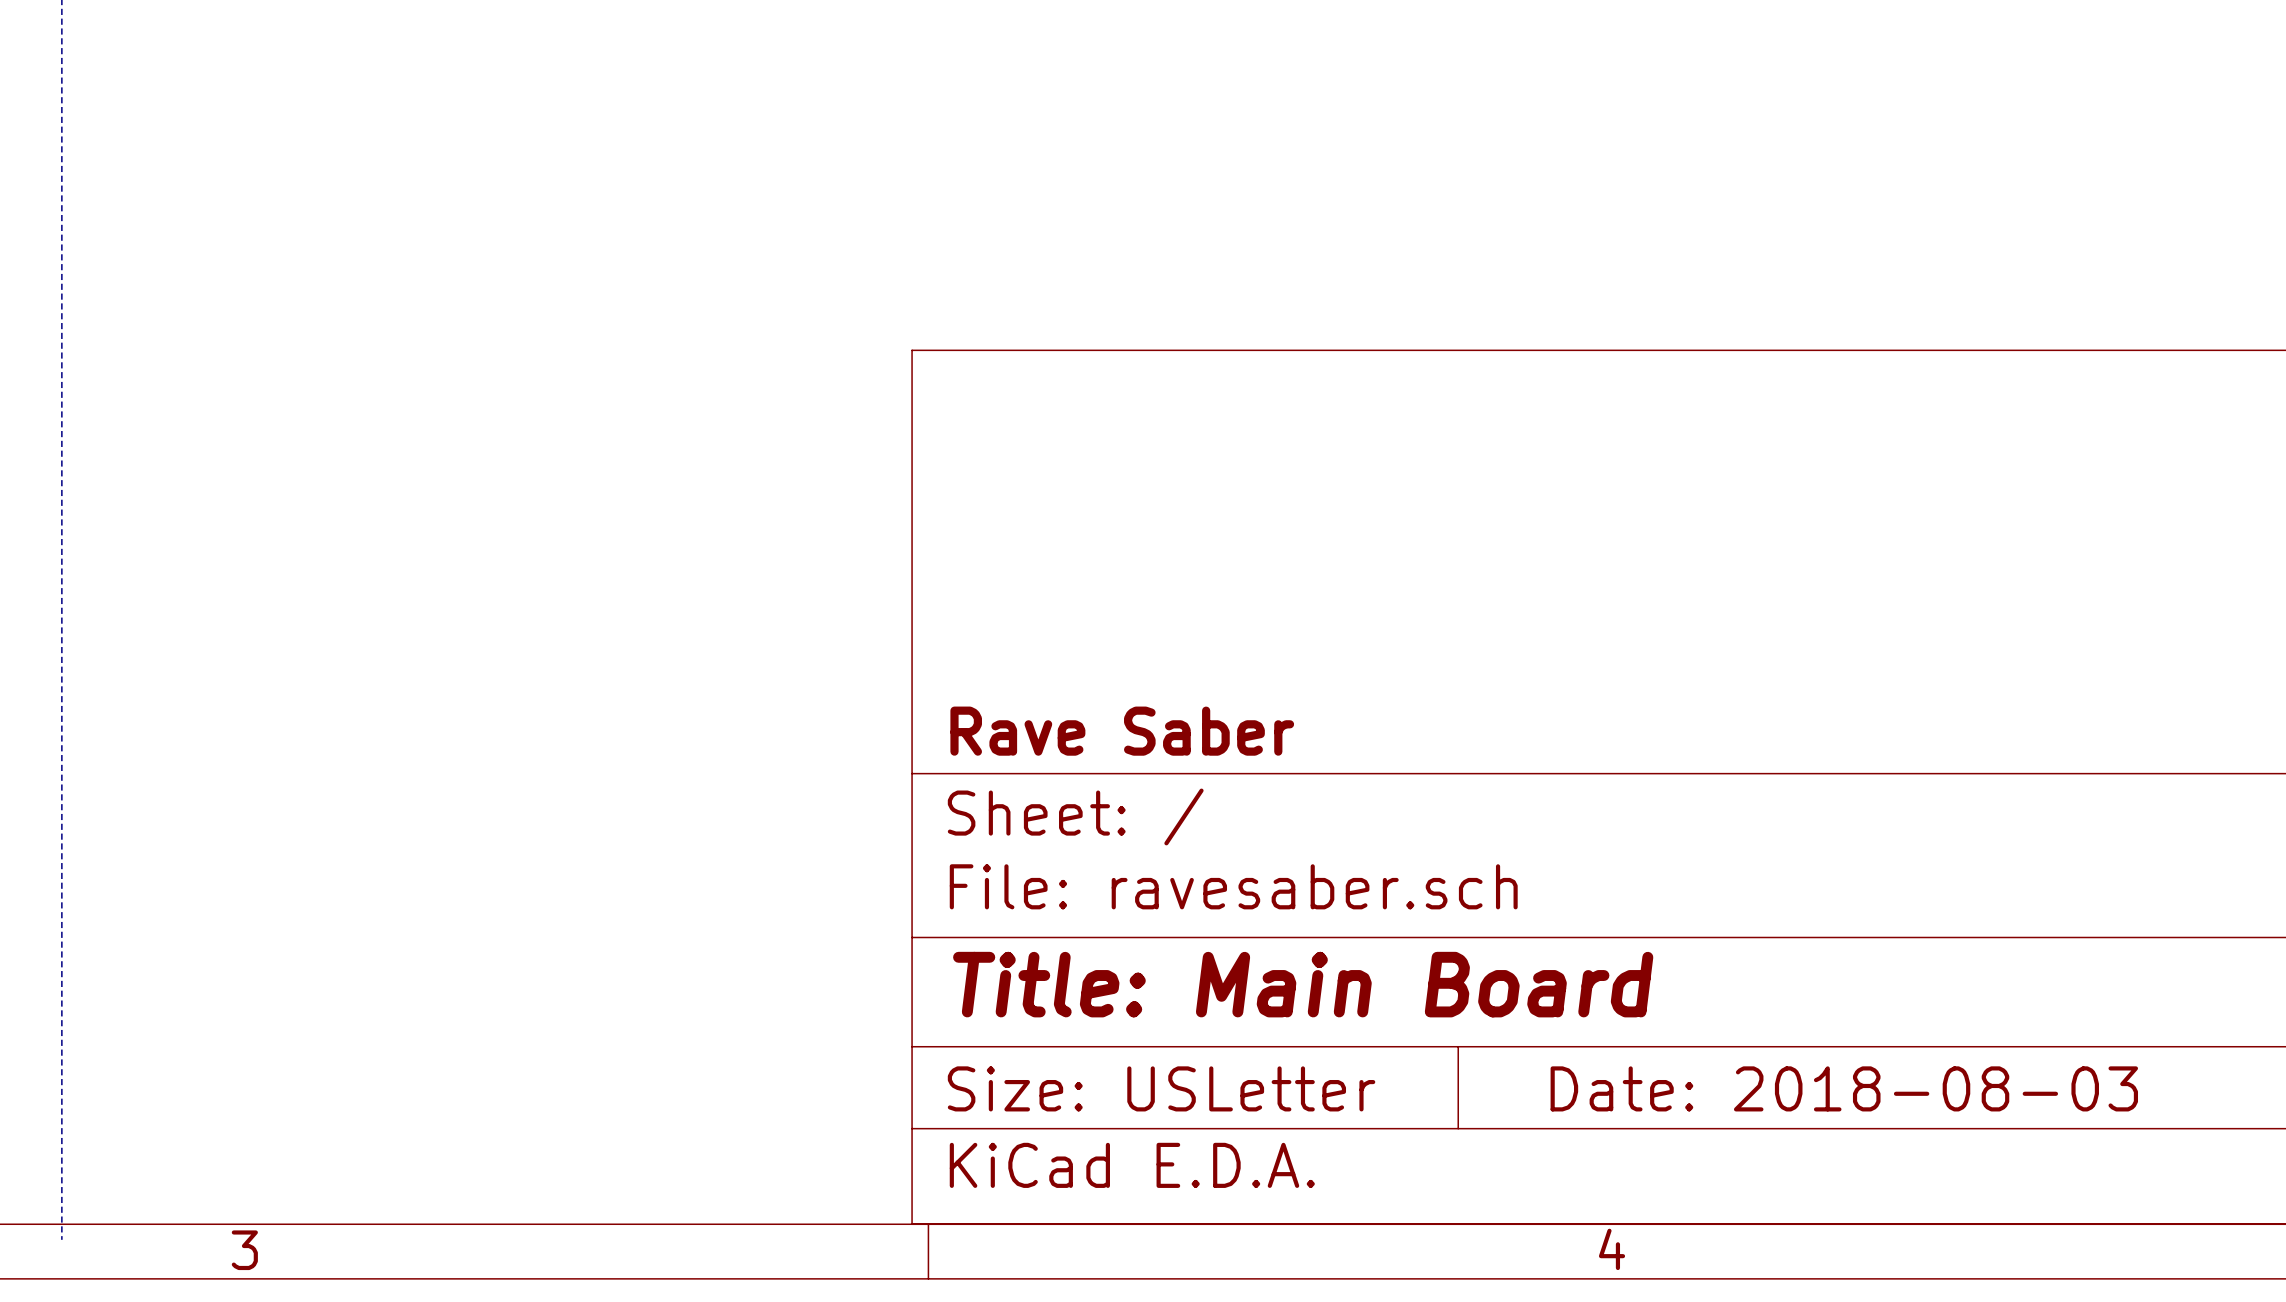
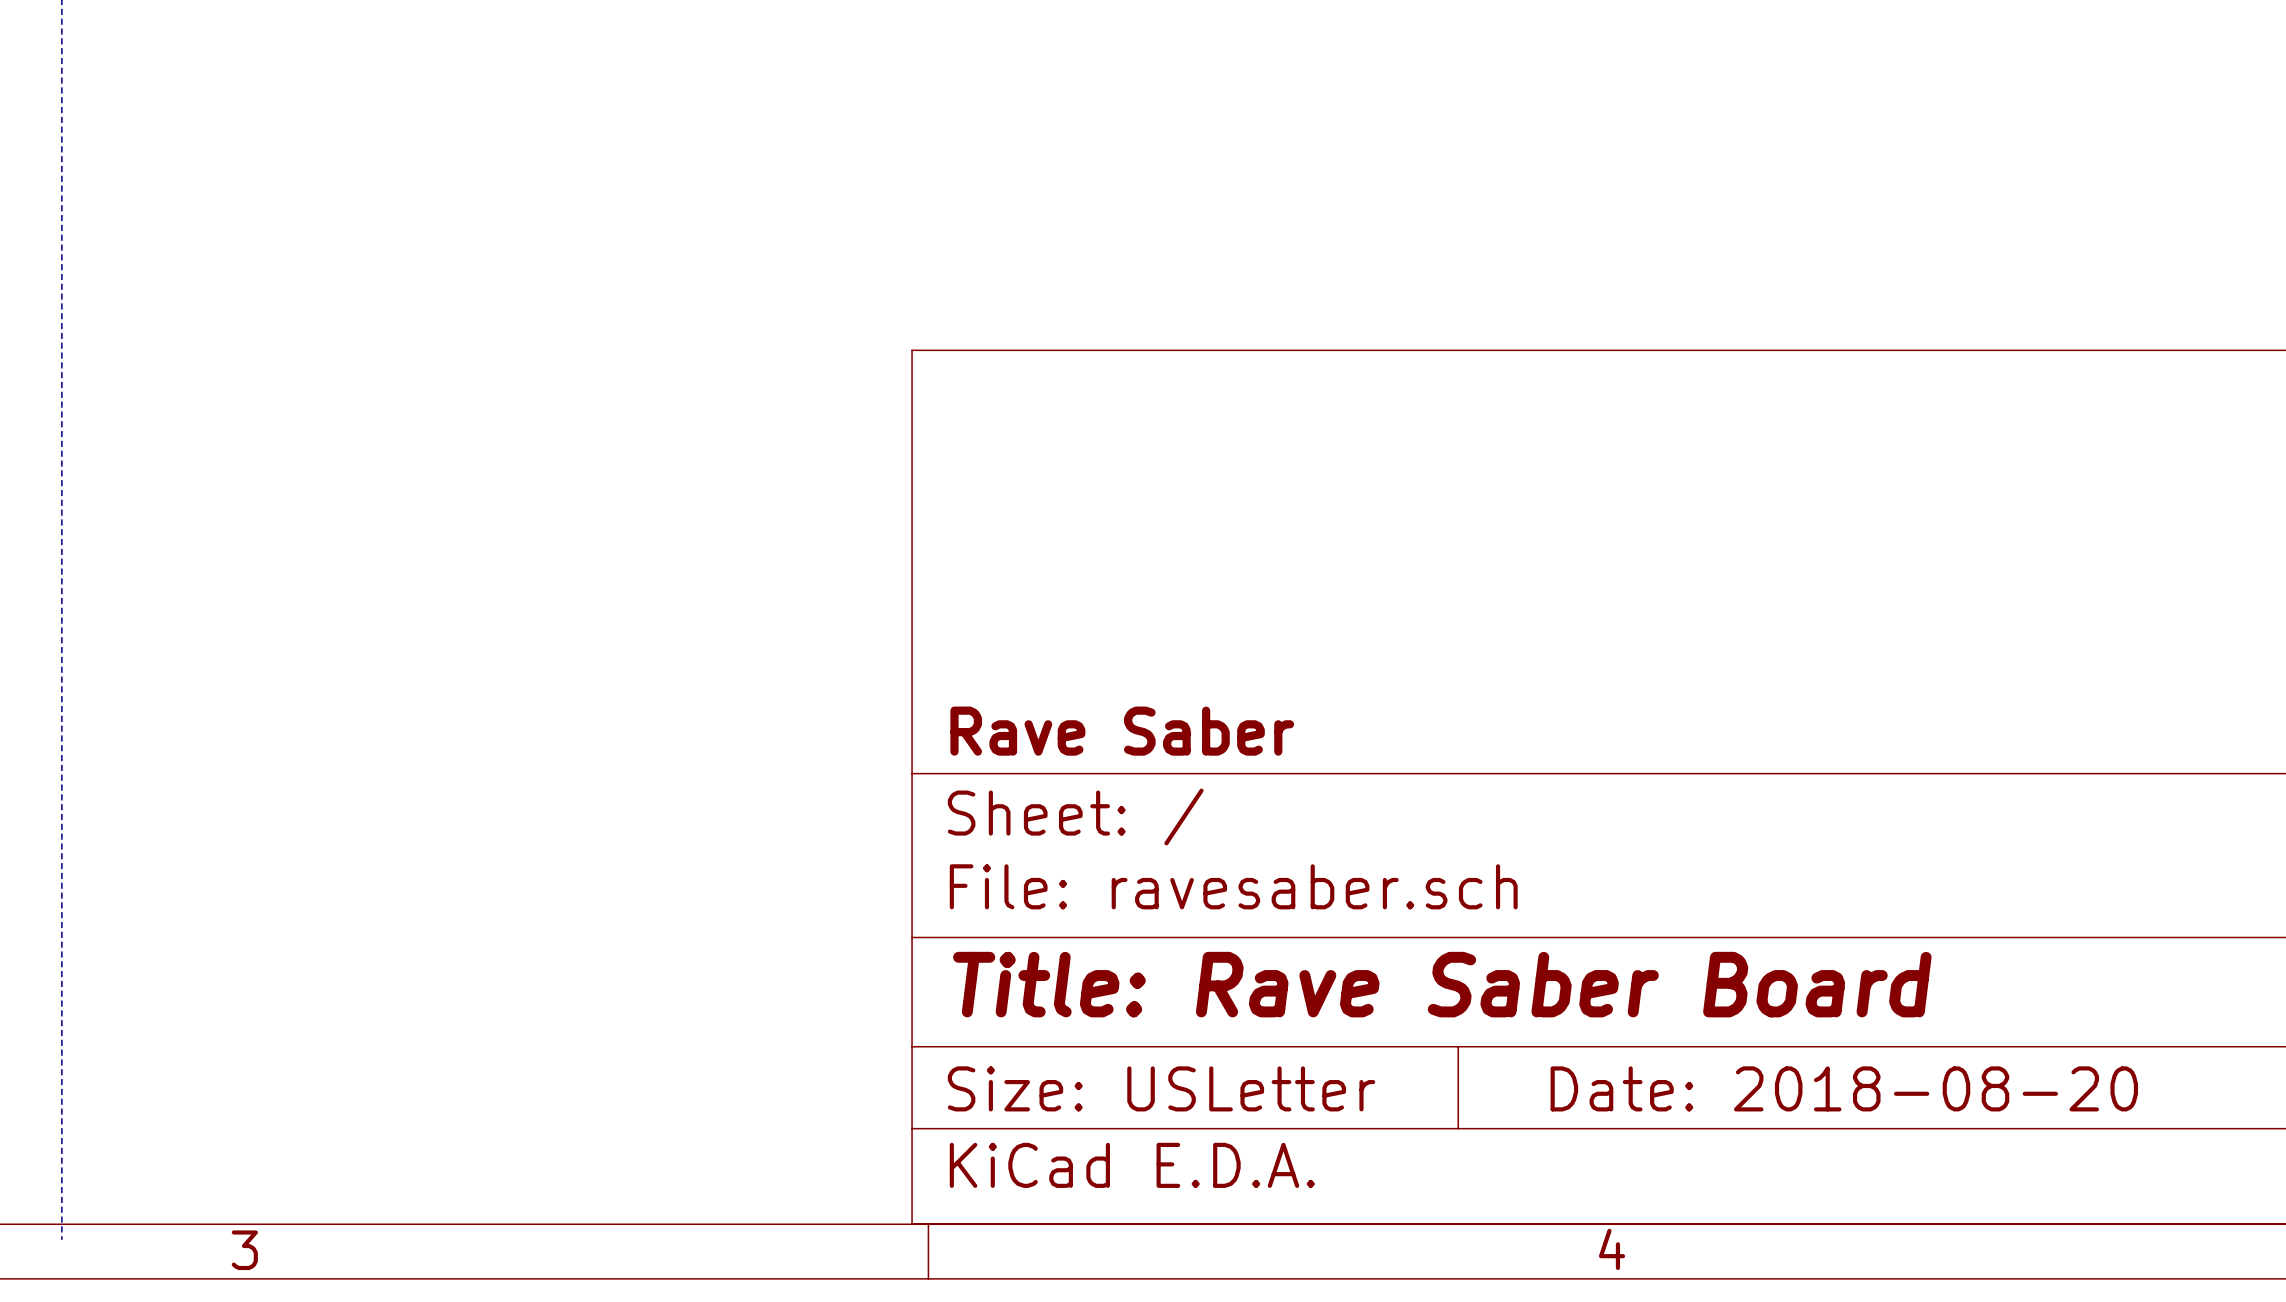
title block: Title: Main Board (1303, 984) -> Title: Rave Saber Board (1442, 984)
title block: Date: 2018-08-03 (1844, 1088) -> Date: 2018-08-20 (1844, 1088)

